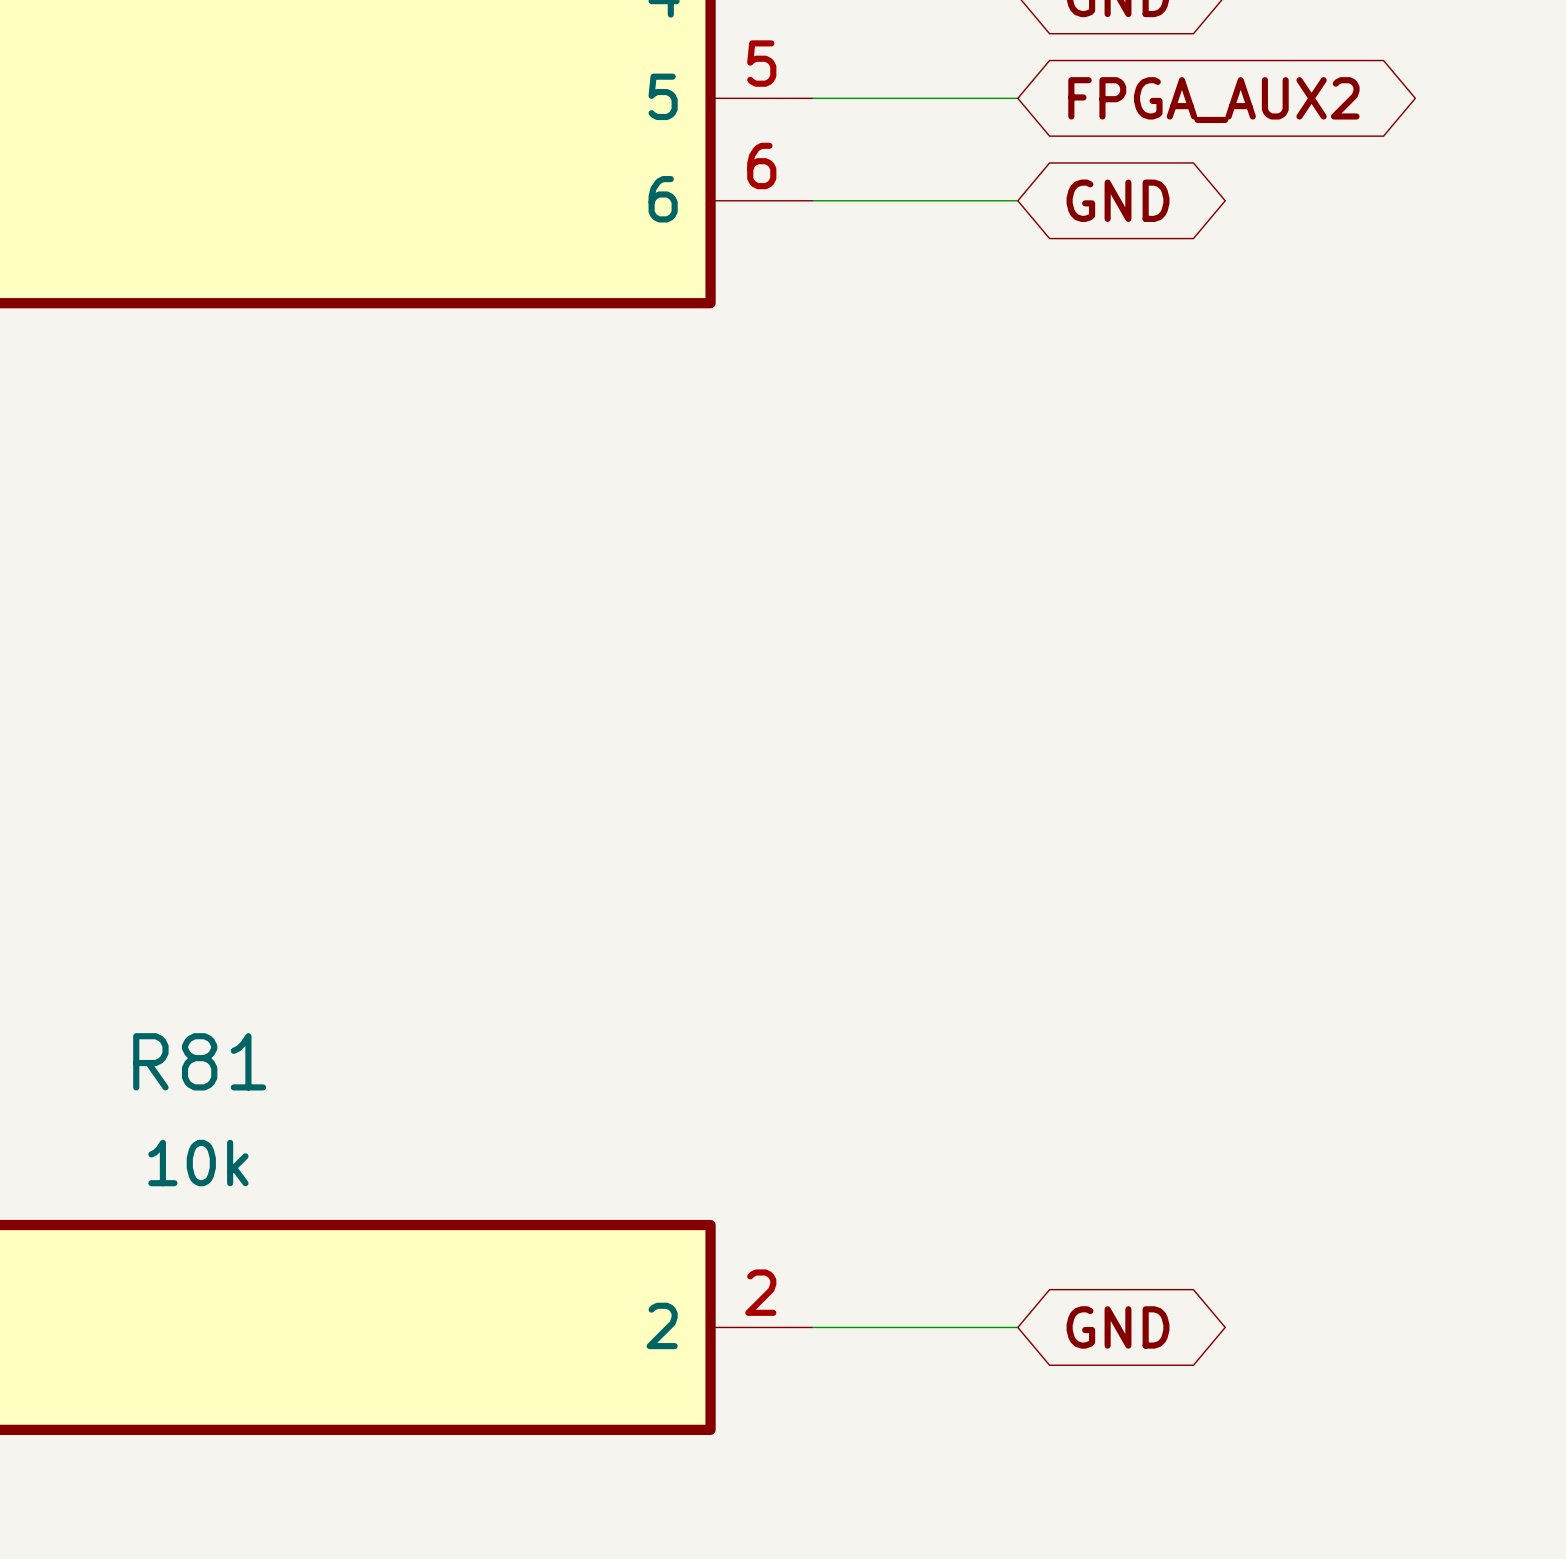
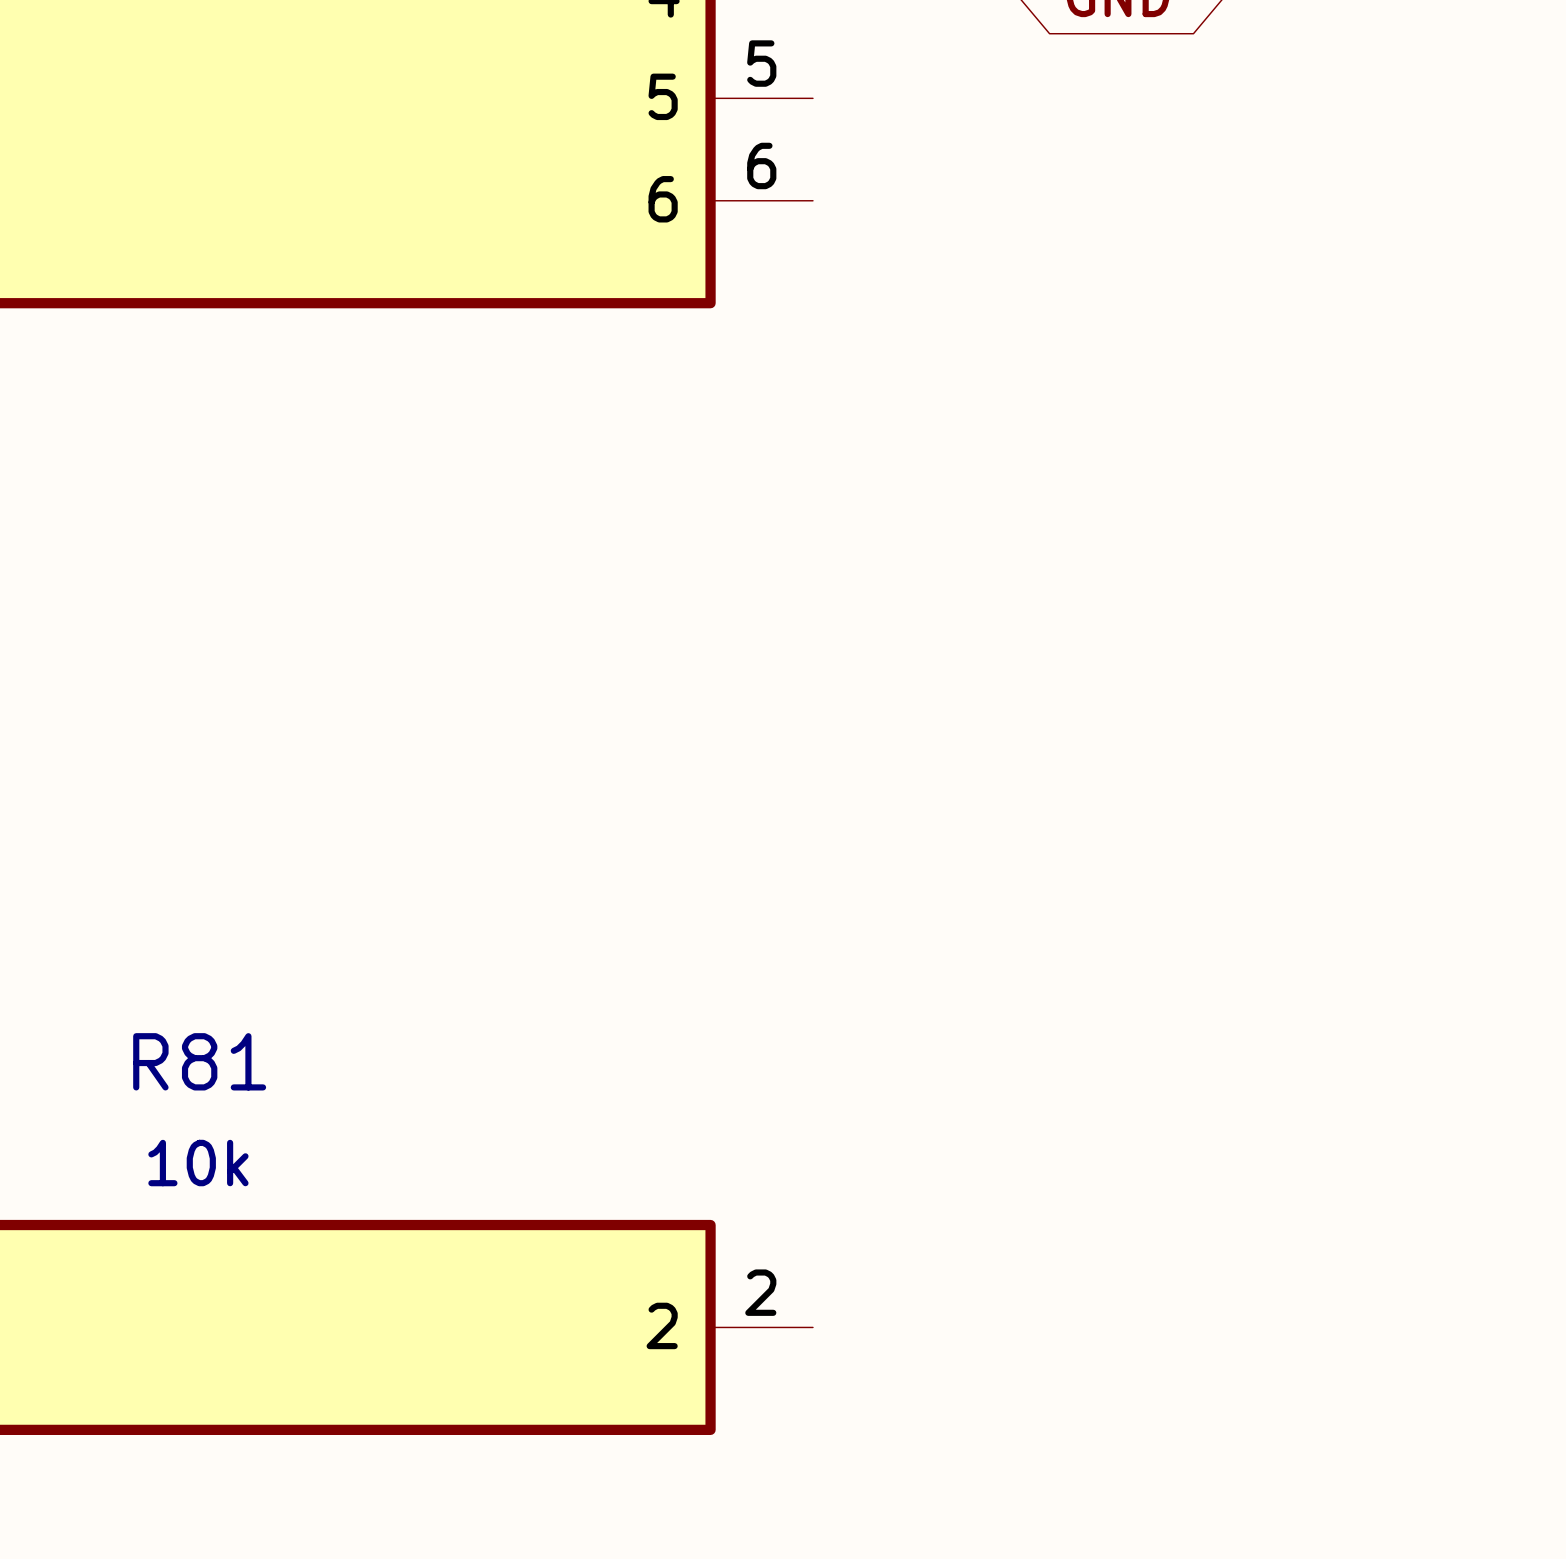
wire: (812, 98) (1017, 98) -> none
global label: FPGA_AUX2 (1213, 100) -> none
wire: (812, 200) (1017, 200) -> none
global label: GND (1118, 200) -> none
wire: (812, 1327) (1017, 1327) -> none
global label: GND (1118, 1327) -> none

